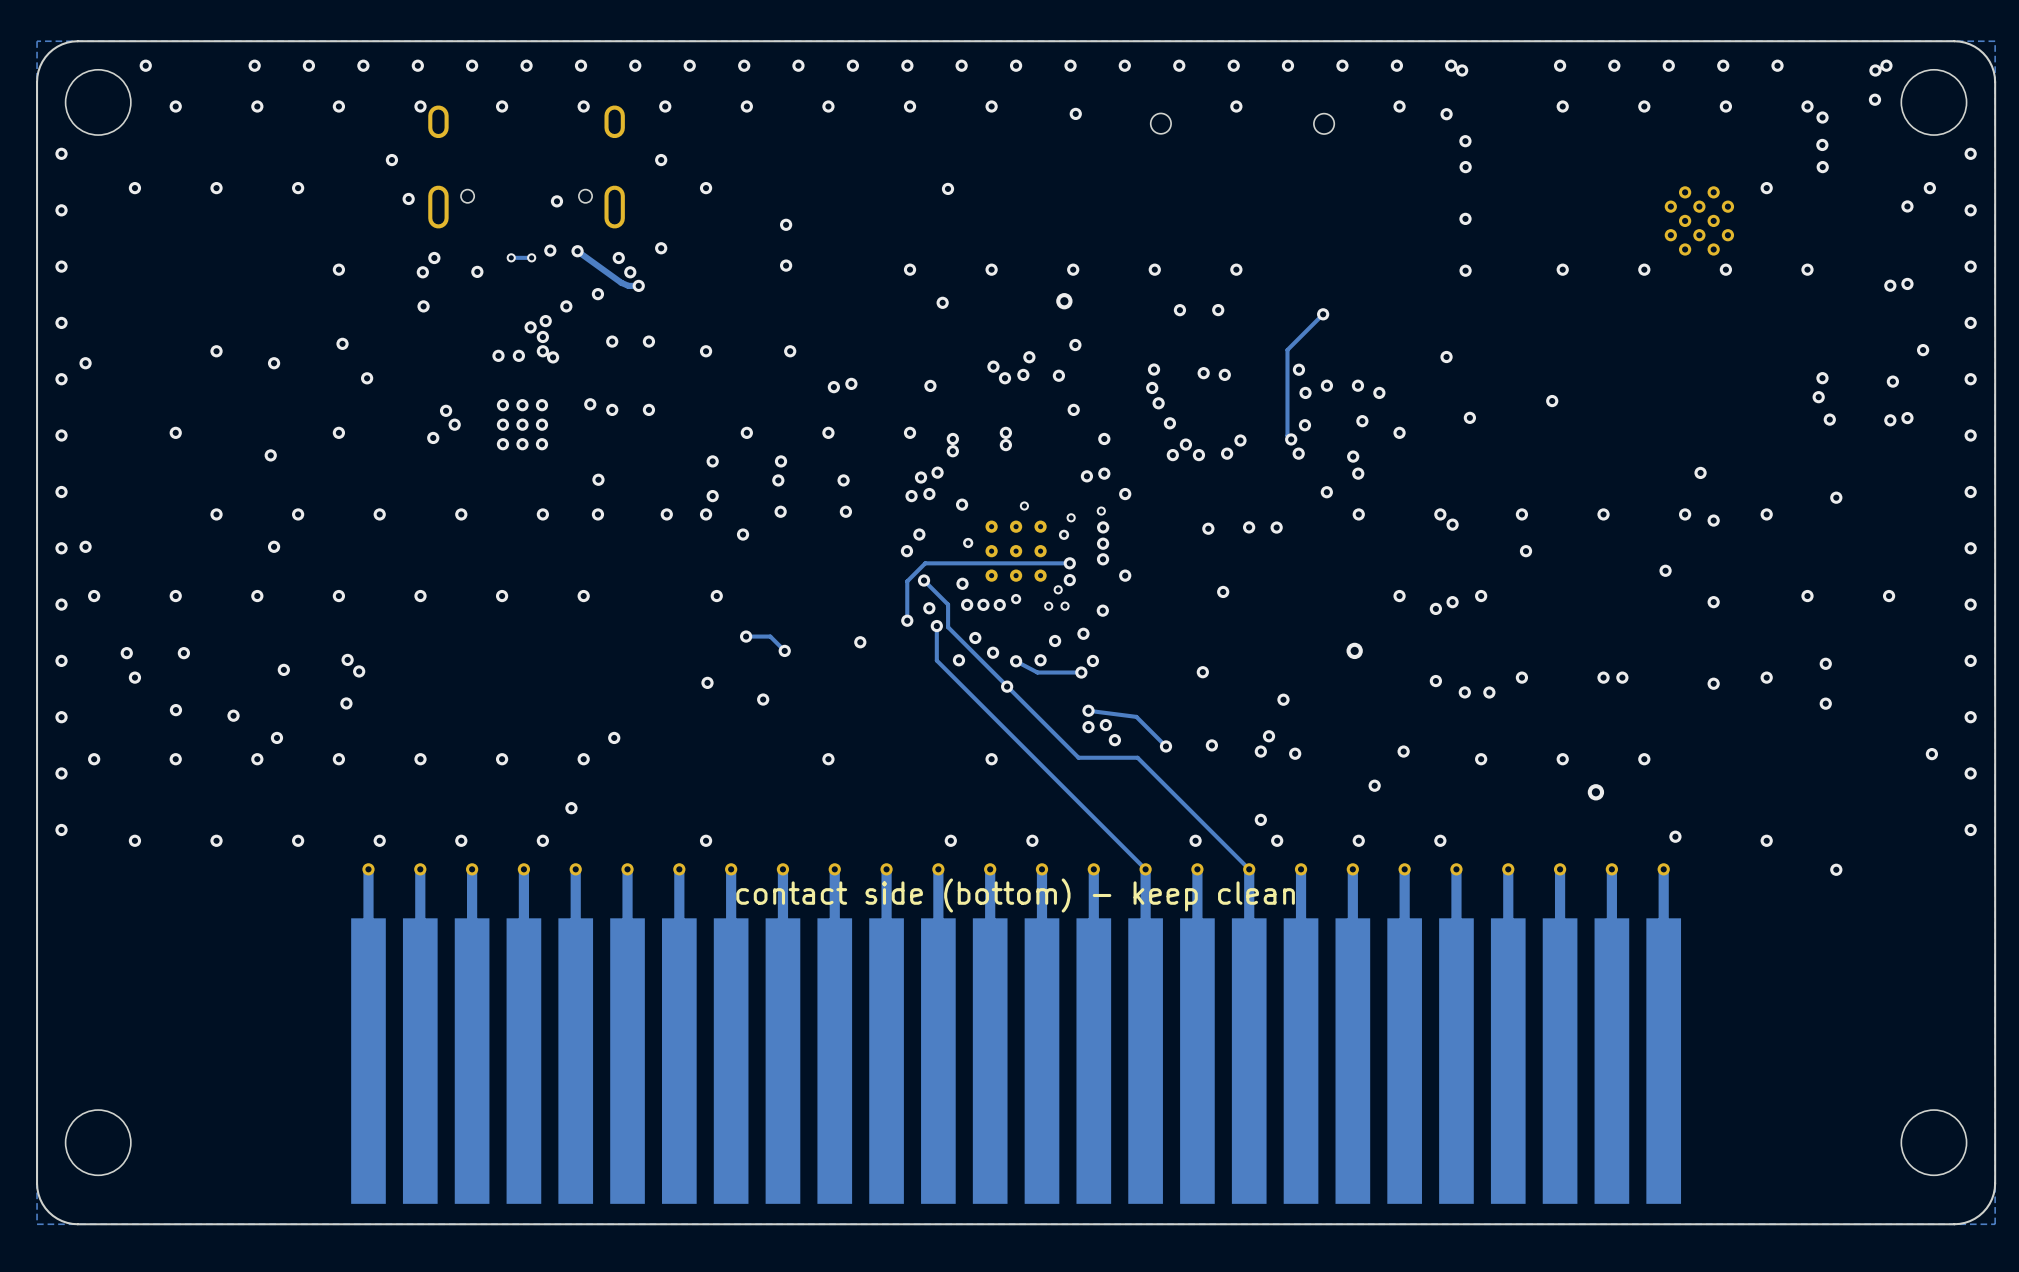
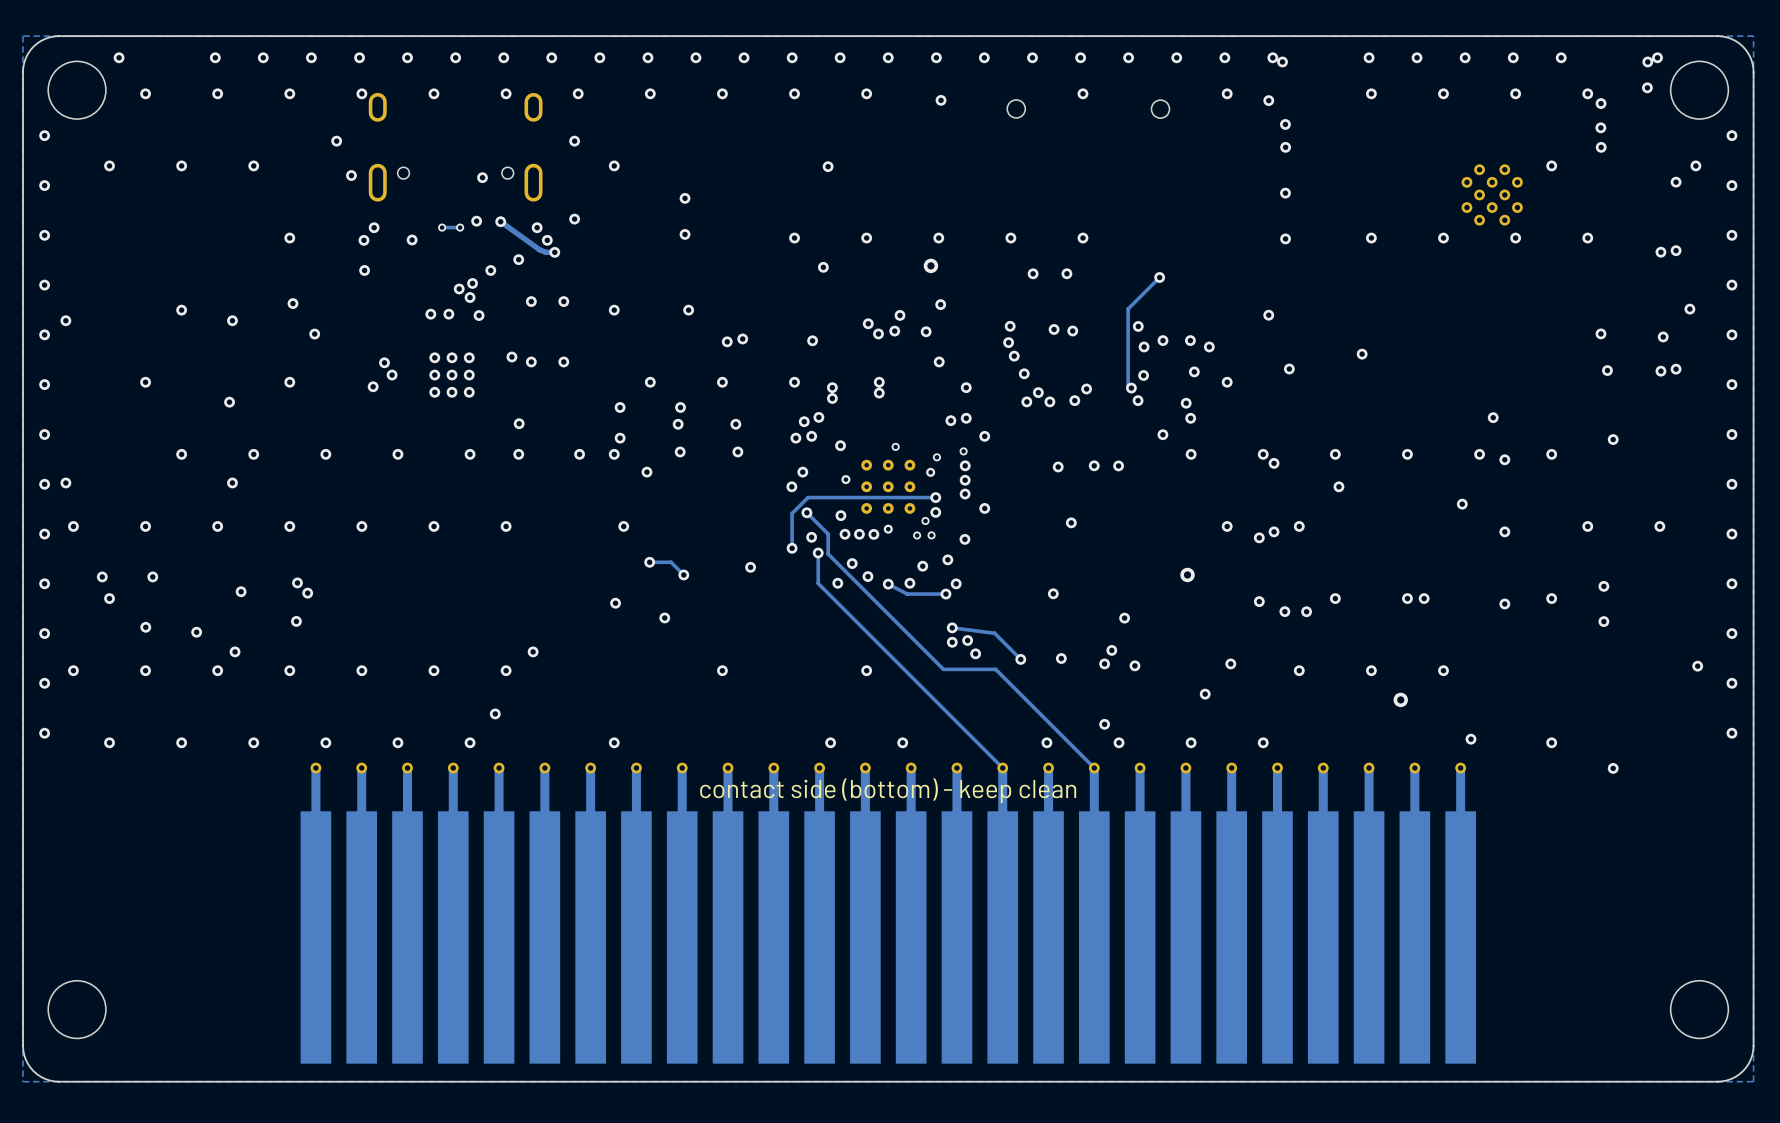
via: (542, 351) -> none
via: (1818, 397) -> none
via: (1007, 686) -> none

